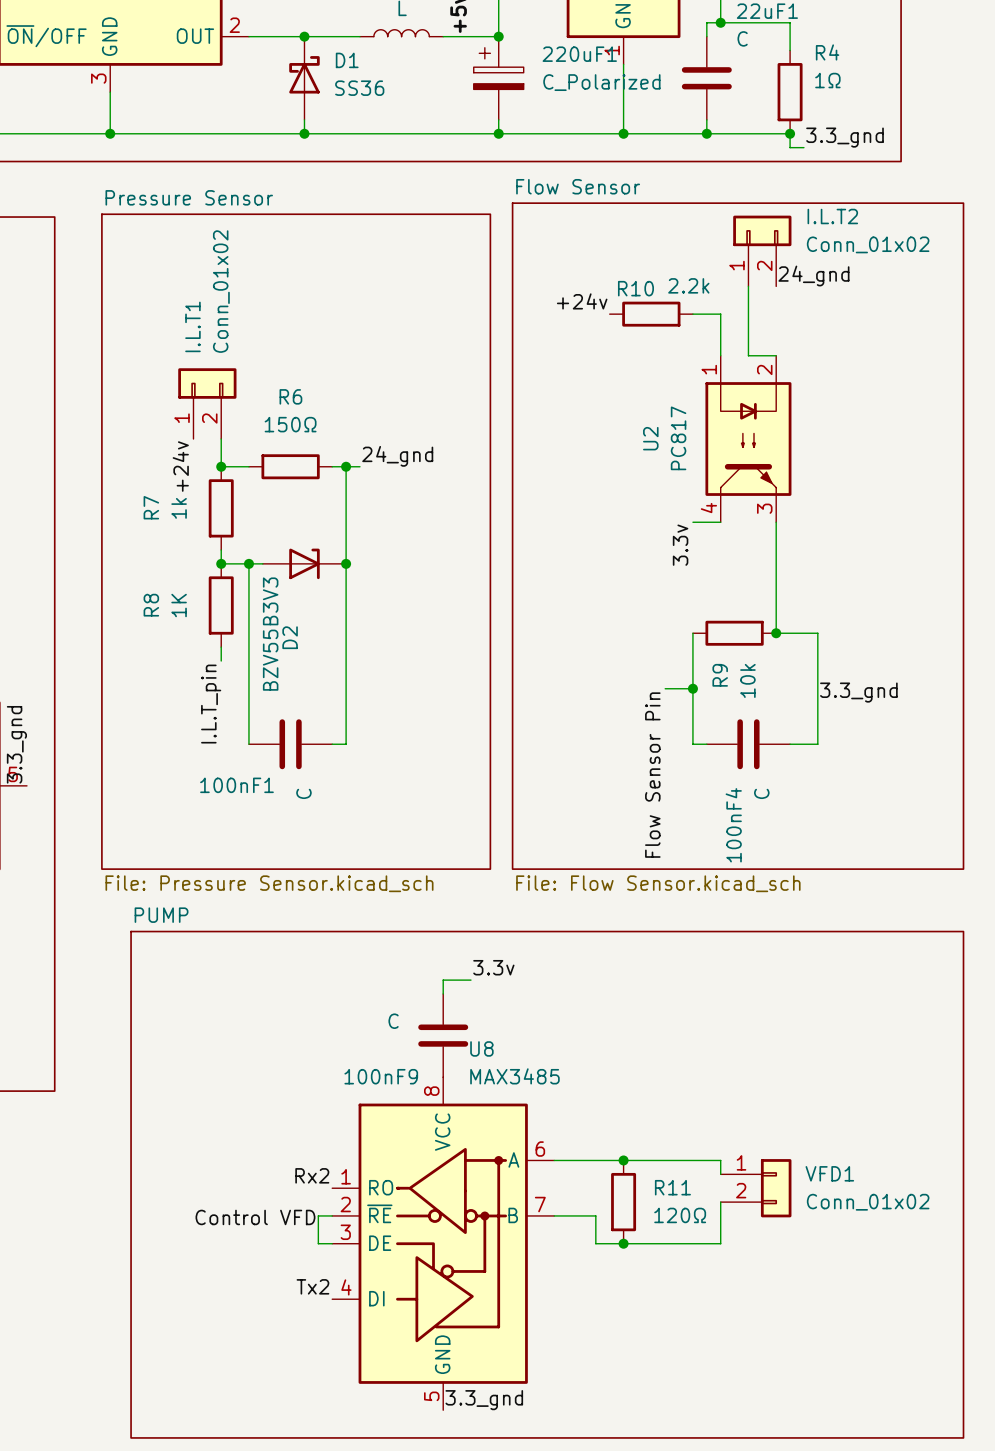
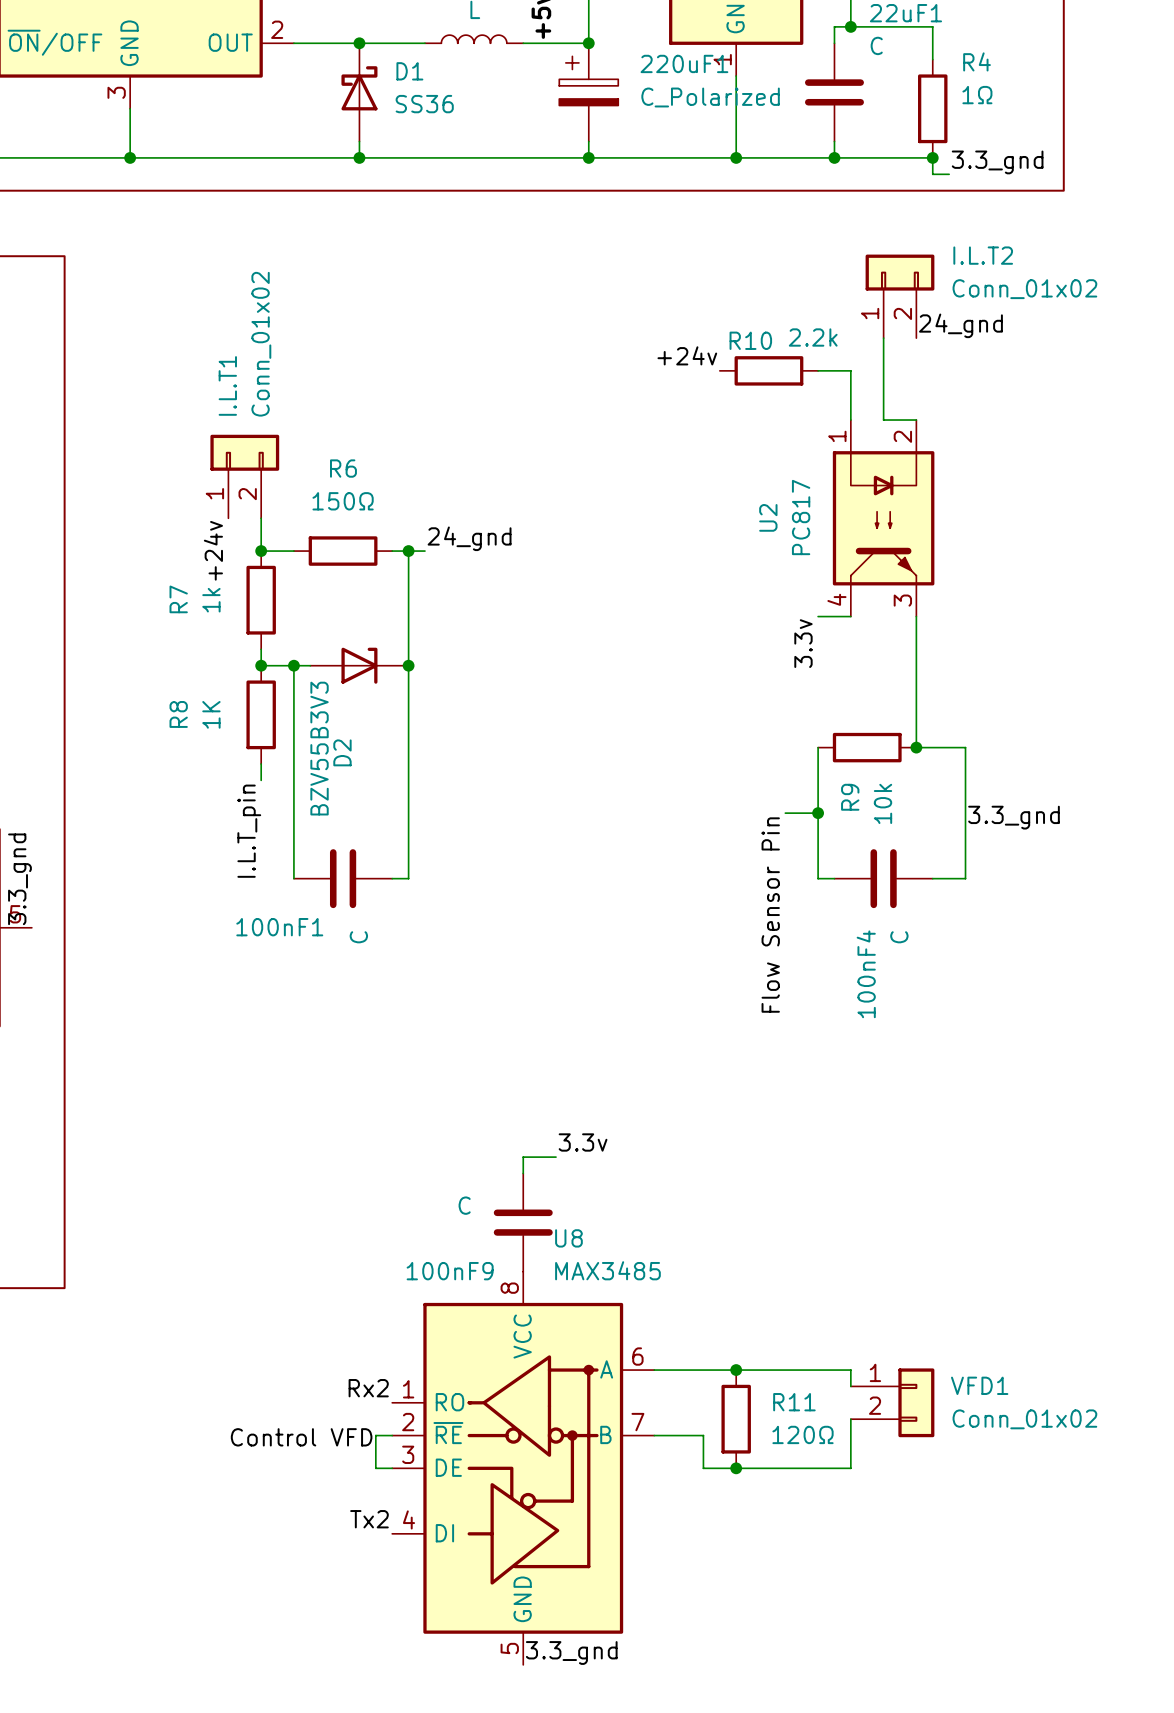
sheet Flow Sensor: File: Flow Sensor.kicad_sch (738, 536) -> none
sheet Pressure Sensor: File: Pressure Sensor.kicad_sch (296, 541) -> none
sheet PUMP: (547, 1184) -> none

